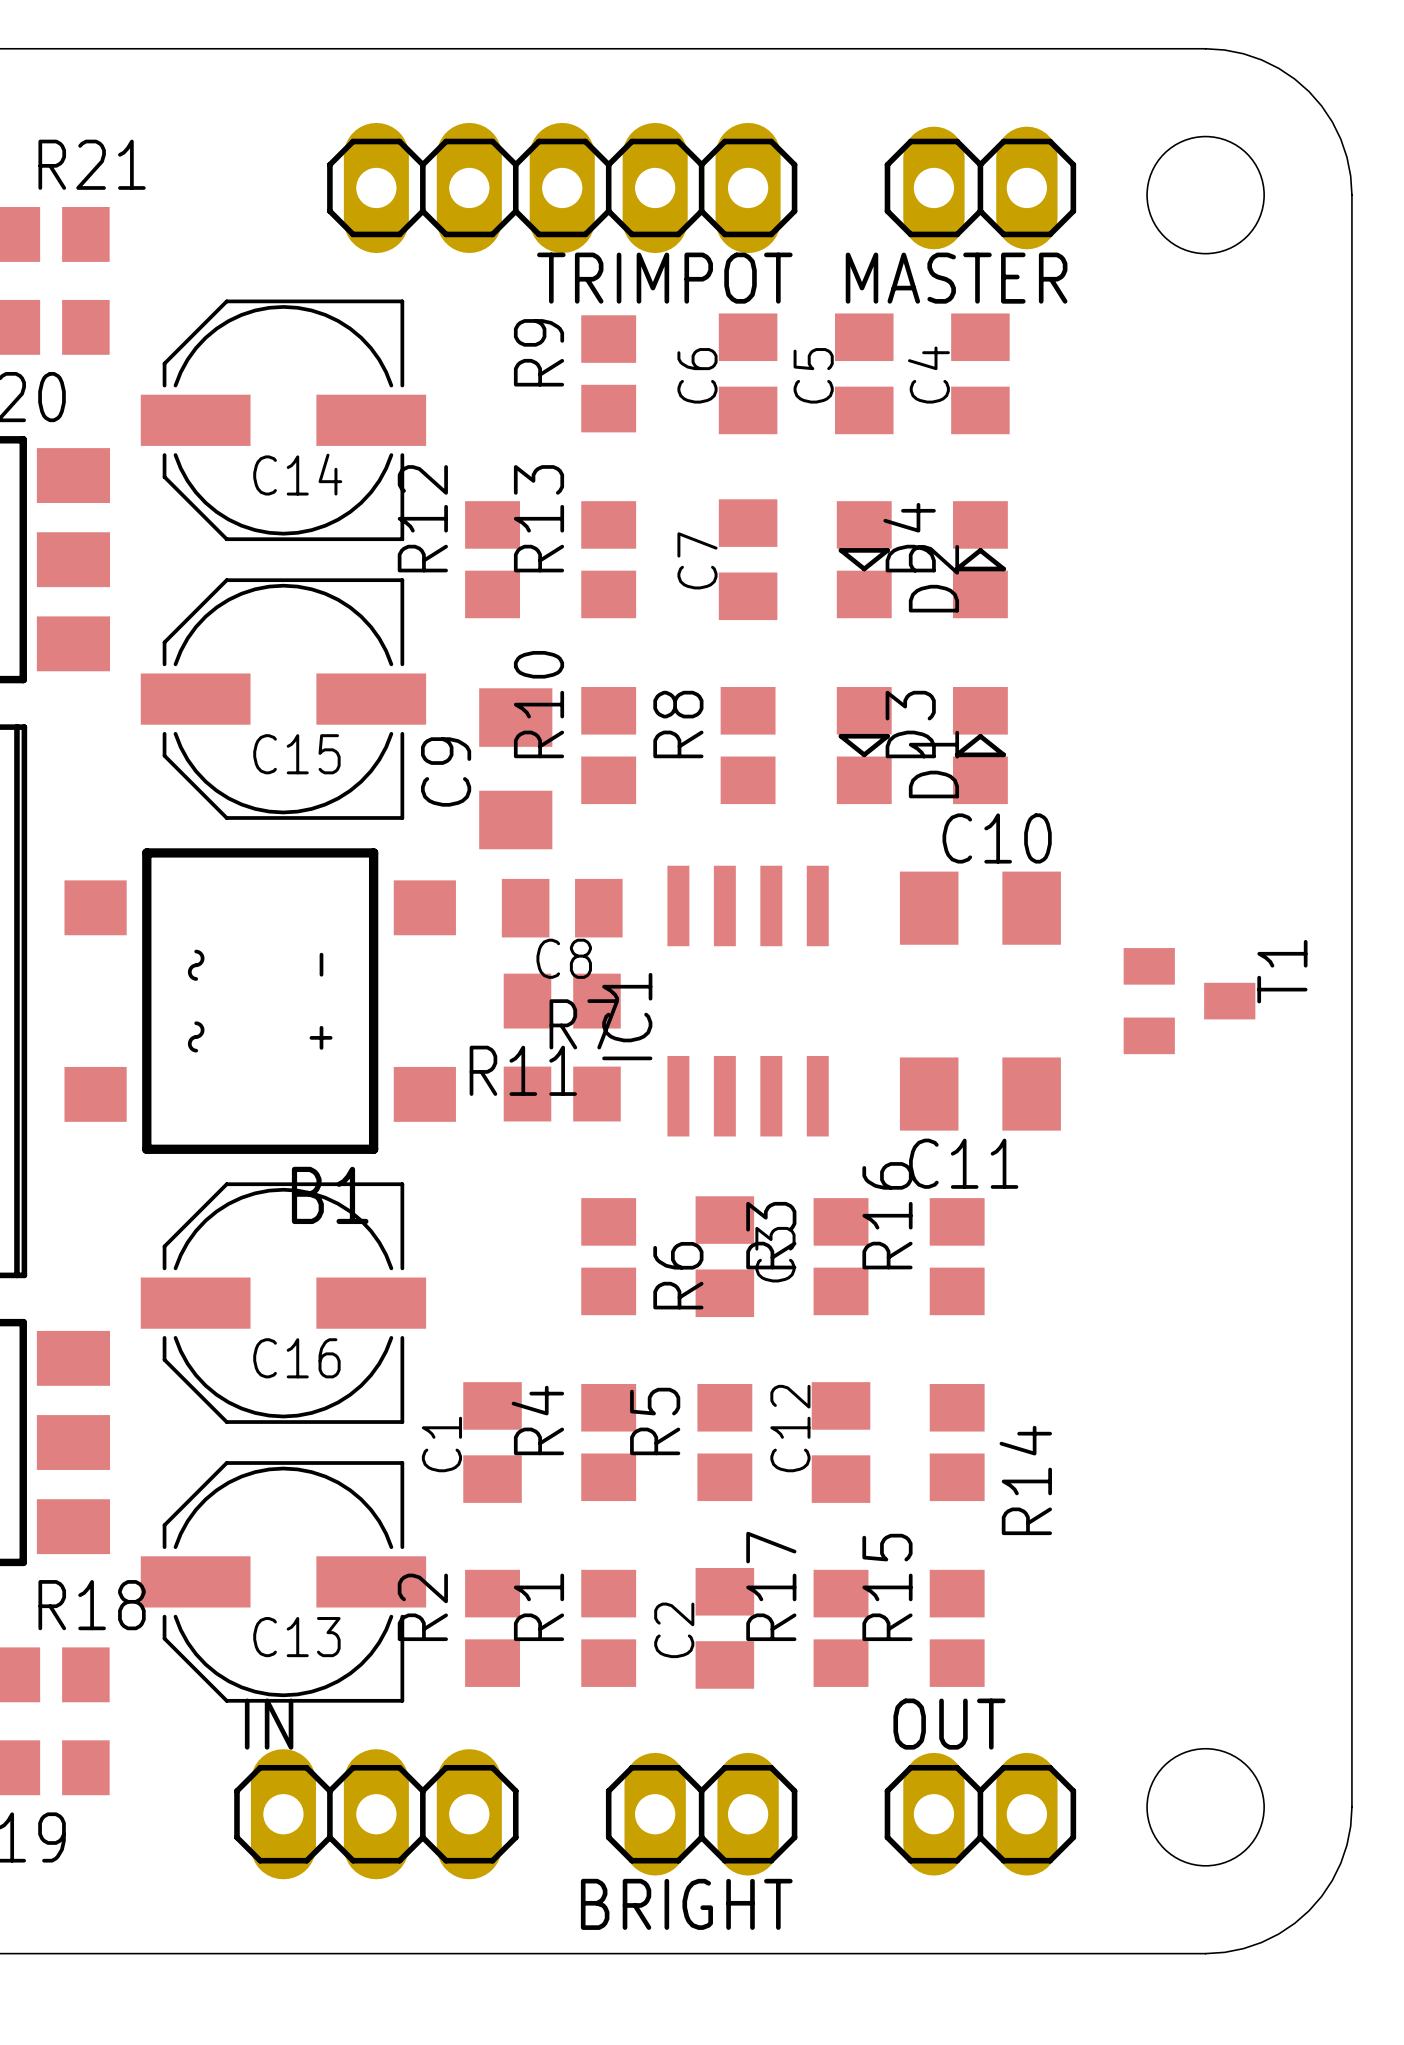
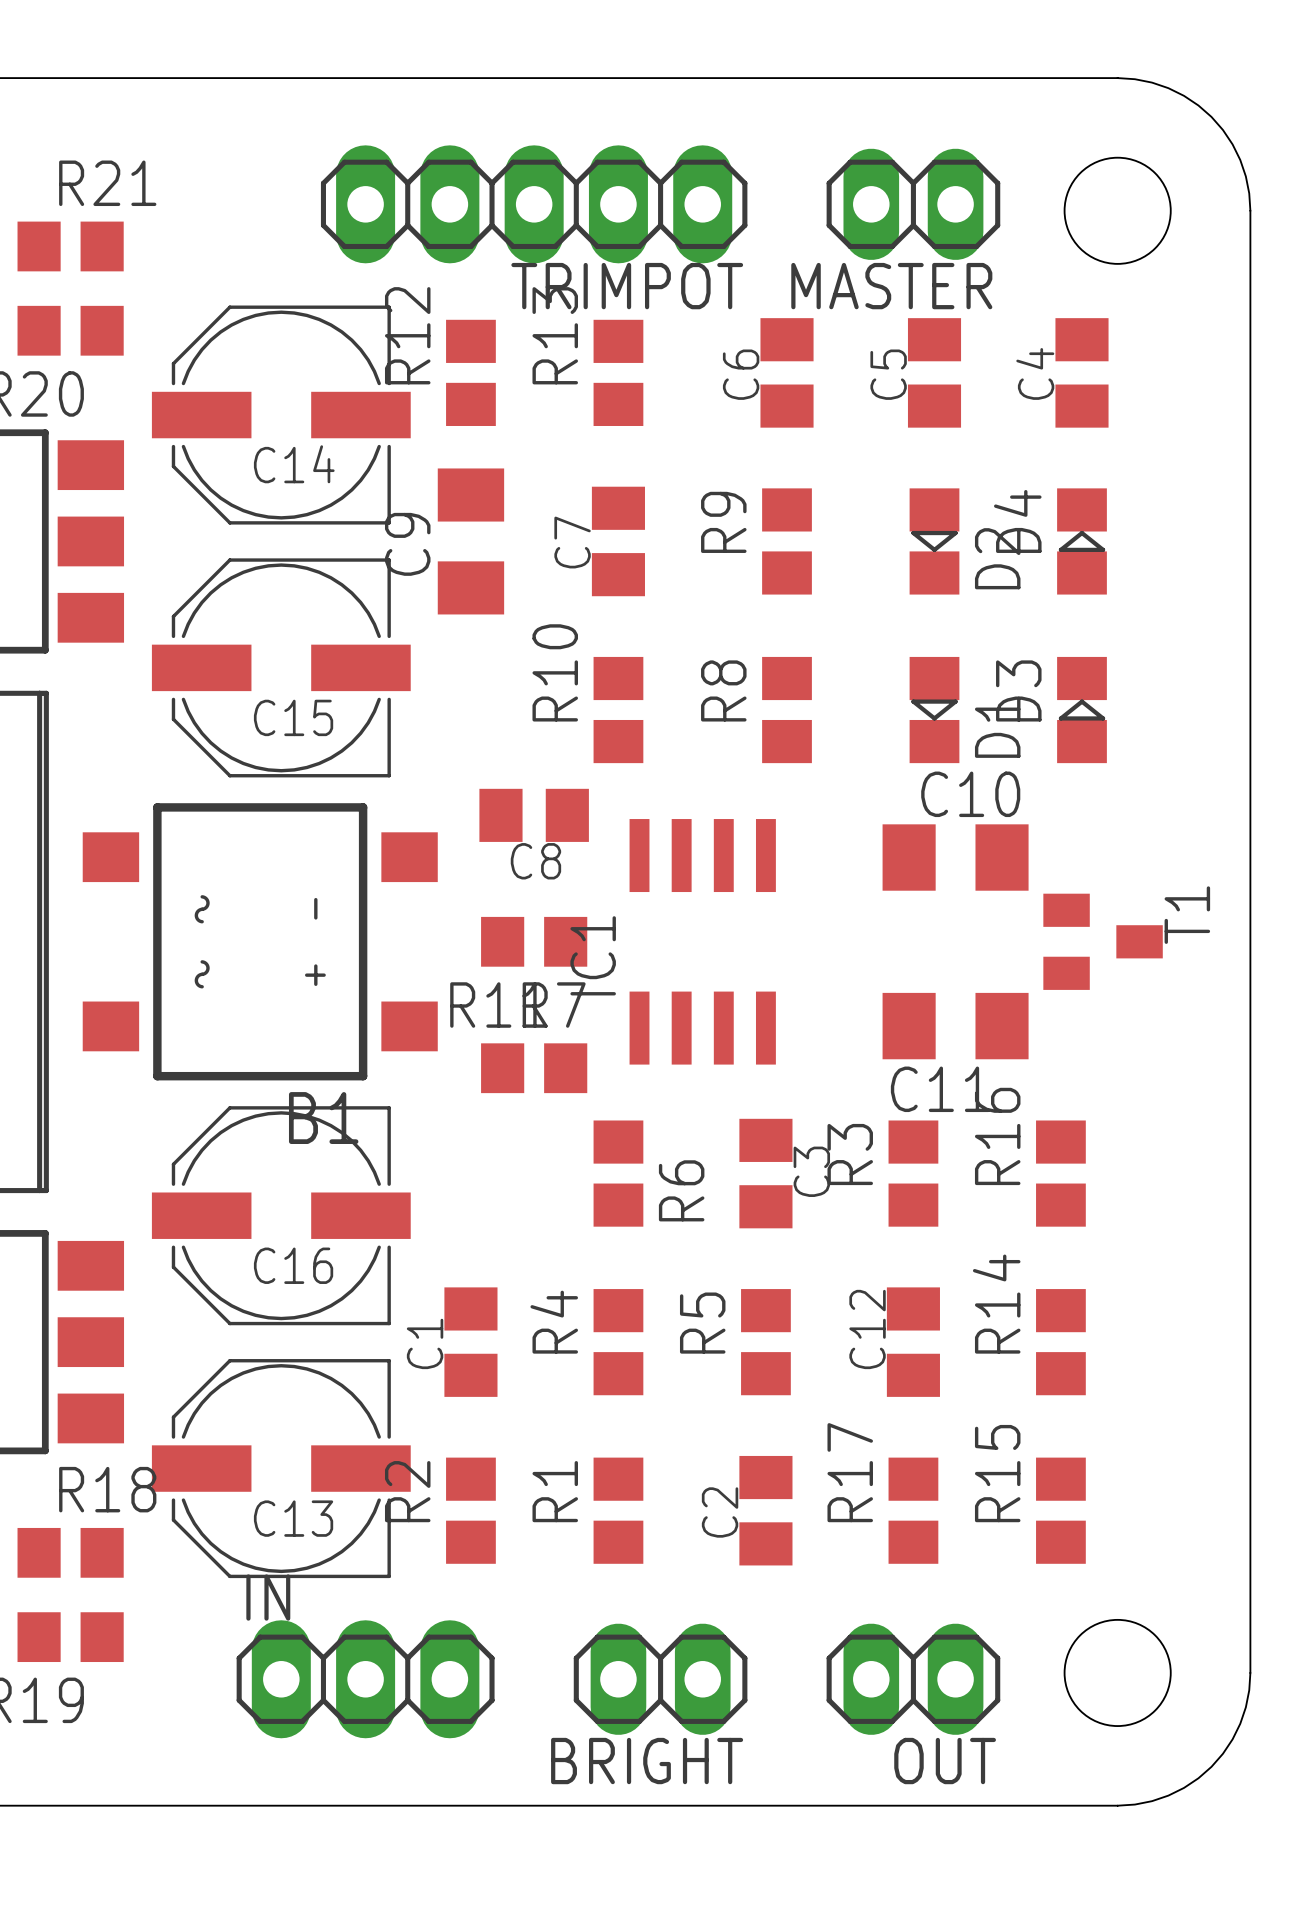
R9 position: (608, 373) -> (787, 541)
C6 position: (748, 373) -> (787, 372)
C5 position: (864, 373) -> (934, 372)
C4 position: (980, 373) -> (1081, 372)
R12 position: (492, 559) -> (470, 372)
R13 position: (608, 559) -> (618, 372)
C7 position: (748, 559) -> (618, 541)
D2 position: (864, 559) -> (934, 541)
D4 position: (980, 559) -> (1081, 541)
R10 position: (608, 745) -> (618, 710)
R8 position: (748, 745) -> (787, 710)
D1 position: (864, 745) -> (934, 710)
D3 position: (980, 745) -> (1081, 710)
C9 position: (515, 768) -> (470, 541)
C8 position: (562, 908) -> (534, 815)
C10 position: (980, 908) -> (955, 857)
R7 position: (562, 1094) -> (534, 1068)
C11 position: (980, 1094) -> (955, 1026)
R6 position: (608, 1256) -> (618, 1173)
C3 position: (724, 1256) -> (765, 1173)
R3 position: (841, 1256) -> (913, 1173)
R16 position: (957, 1256) -> (1060, 1173)
R4 position: (608, 1442) -> (618, 1342)
R5 position: (724, 1442) -> (765, 1342)
C12 position: (841, 1442) -> (913, 1342)
R14 position: (957, 1442) -> (1060, 1342)
R14 name position: R14 (1025, 1480) -> R14 (996, 1304)
R1 position: (608, 1628) -> (618, 1510)
C2 position: (724, 1628) -> (765, 1510)
R17 position: (841, 1628) -> (913, 1510)
R15 position: (957, 1628) -> (1060, 1510)
OUT name position: OUT (949, 1724) -> OUT (945, 1761)

